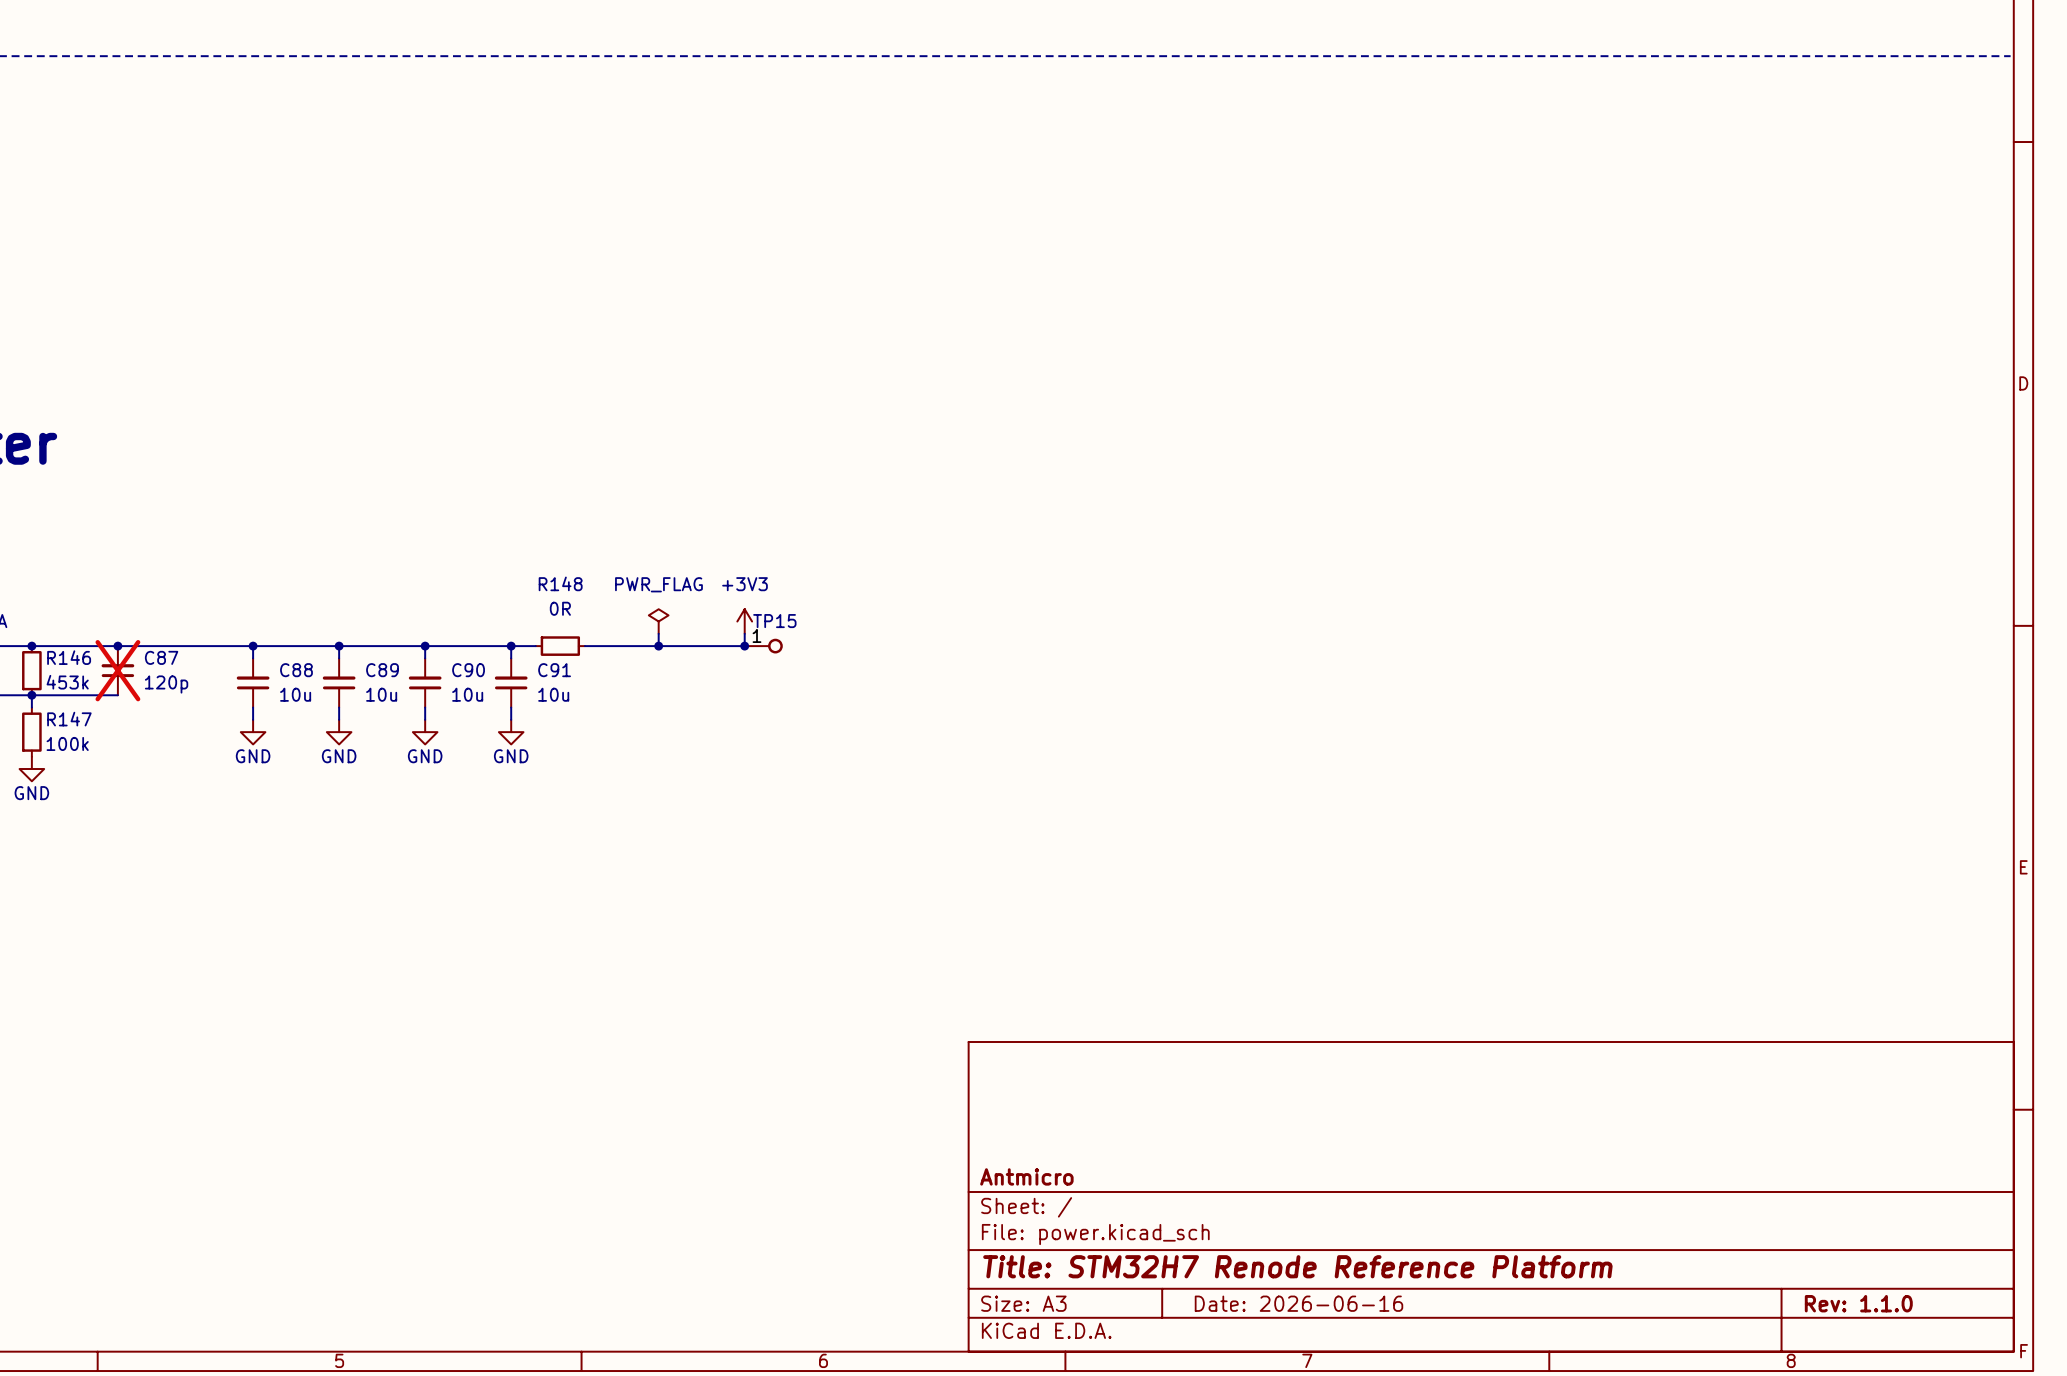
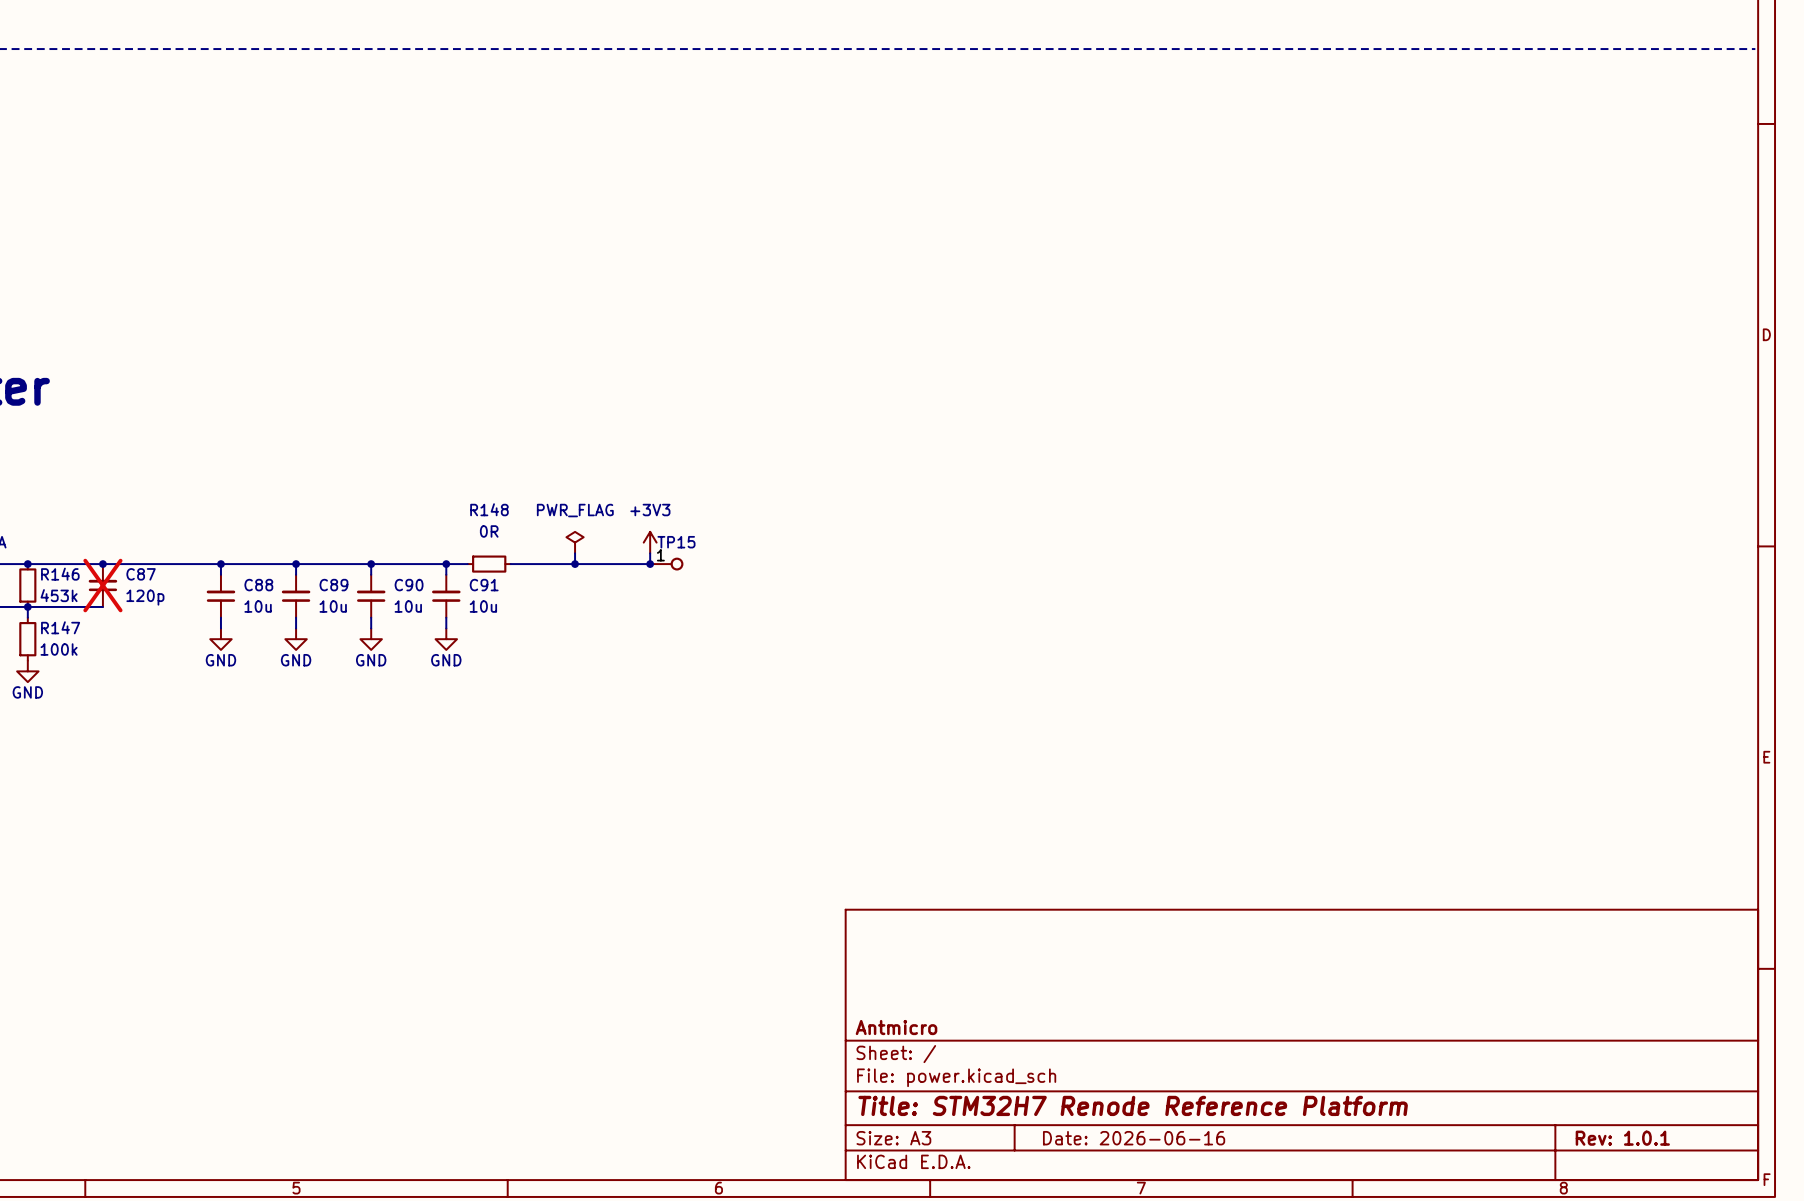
title block: Rev: 1.1.0 (1858, 1303) -> Rev: 1.0.1 (1622, 1138)

